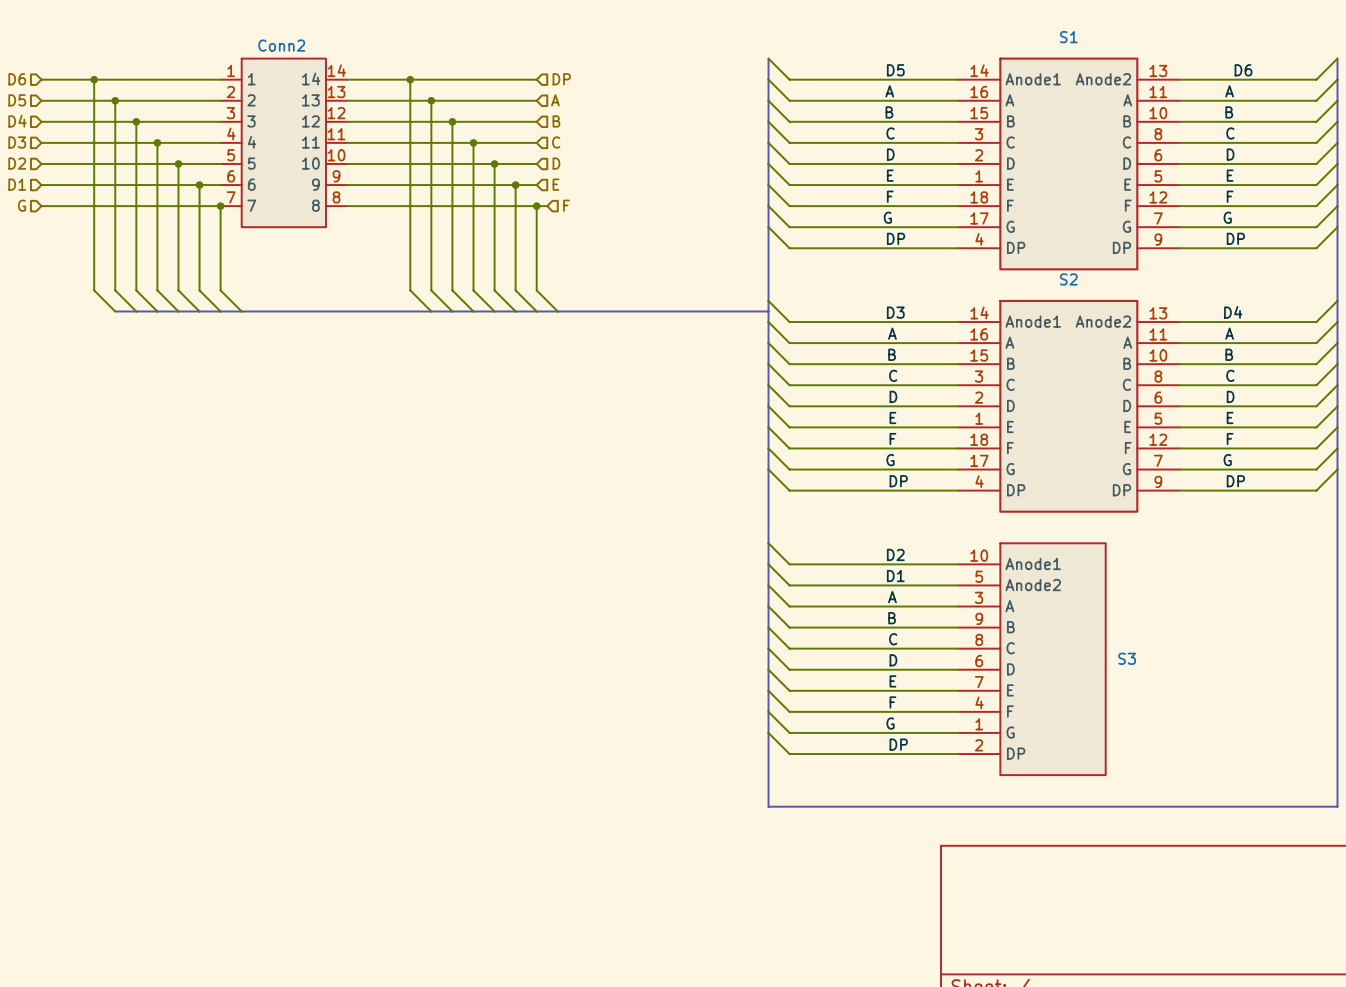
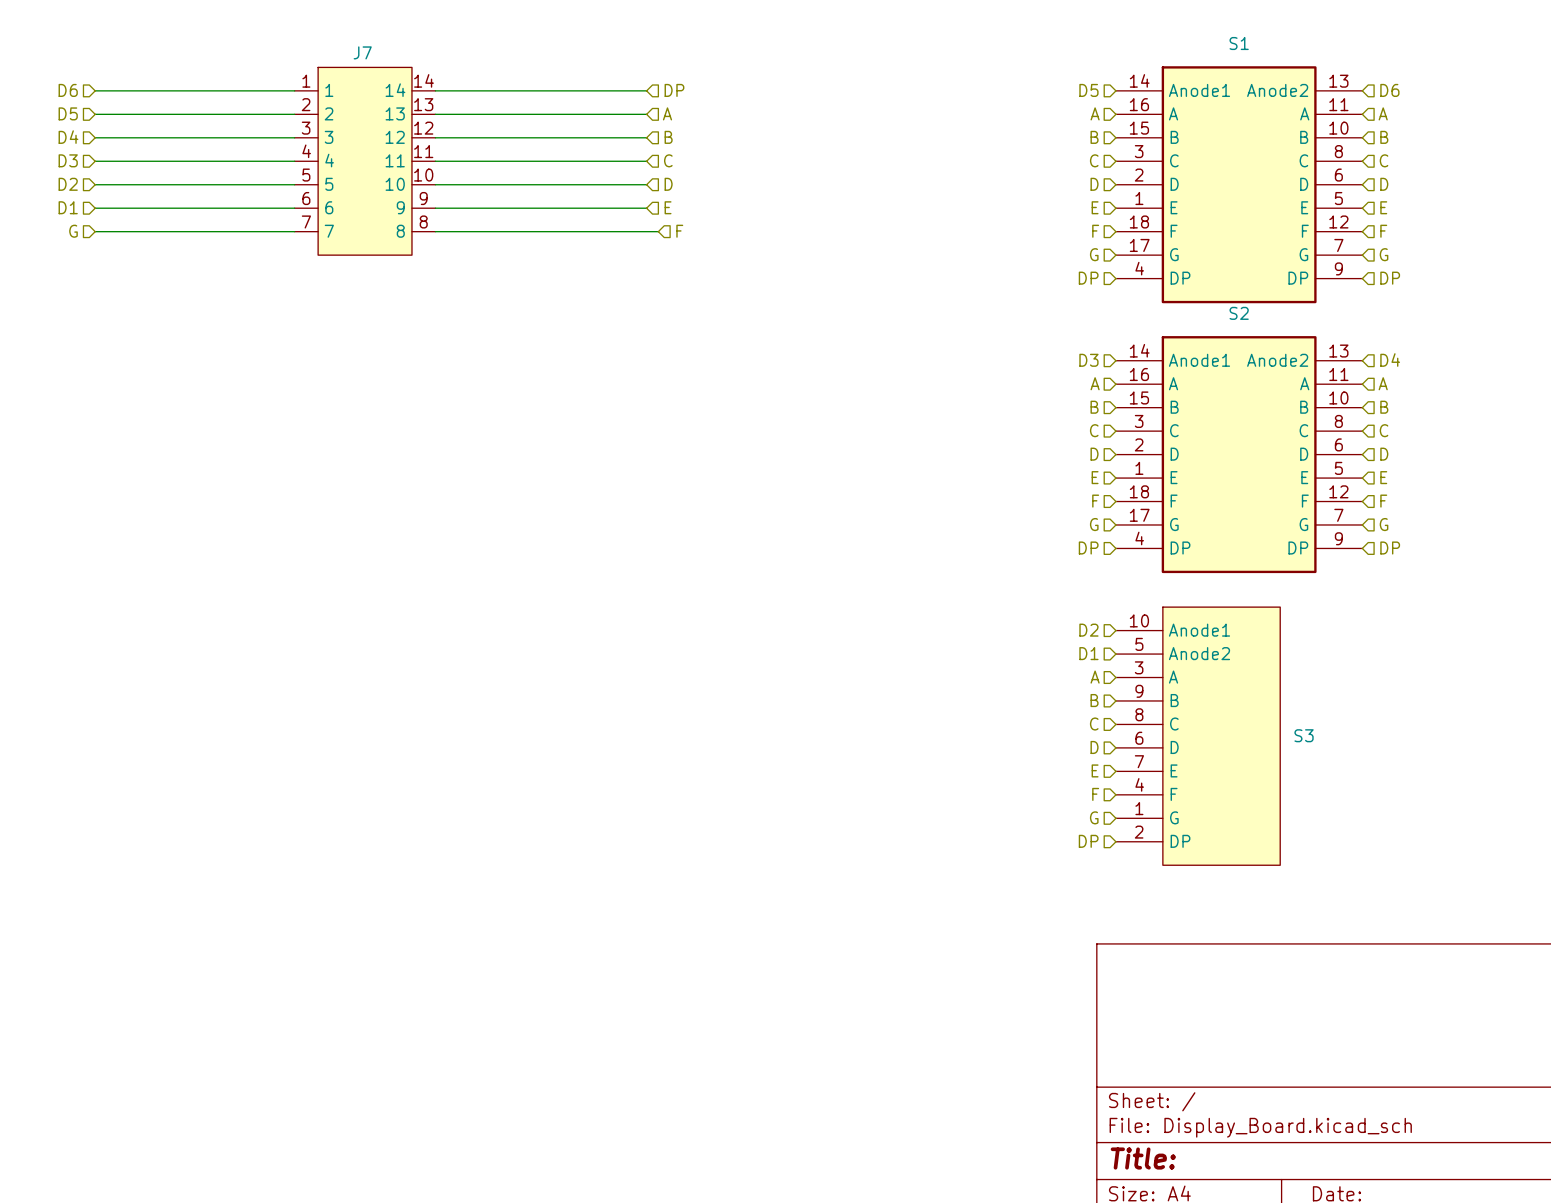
Conn2 name: Conn2 (281, 45) -> J7 (362, 52)
wire: (768, 58) (789, 79) (958, 79) -> none
bus: (768, 58) (768, 806) (1337, 806) (1337, 58) -> none
wire: (1337, 58) (1316, 79) (1179, 79) -> none
label: D5 (895, 70) -> none
label: D6 (1243, 70) -> none
wire: (94, 79) (94, 290) (115, 311) -> none
junction: (94, 79) -> none
wire: (410, 79) (410, 290) (431, 311) -> none
junction: (410, 79) -> none
wire: (768, 79) (789, 100) (958, 100) -> none
hierarchical label: none -> D5 (1088, 90)
hierarchical label: none -> D6 (1389, 90)
wire: (1337, 79) (1316, 100) (1179, 100) -> none
label: A (889, 91) -> none
label: A (1229, 91) -> none
wire: (115, 100) (115, 290) (136, 311) -> none
junction: (115, 100) -> none
wire: (431, 100) (431, 290) (452, 311) -> none
junction: (431, 100) -> none
wire: (768, 100) (789, 121) (958, 121) -> none
hierarchical label: none -> A (1095, 113)
hierarchical label: none -> A (1383, 113)
wire: (1337, 100) (1316, 121) (1179, 121) -> none
label: B (889, 112) -> none
label: B (1229, 112) -> none
wire: (136, 121) (136, 290) (157, 311) -> none
junction: (136, 121) -> none
wire: (452, 121) (452, 290) (473, 311) -> none
junction: (452, 121) -> none
wire: (768, 121) (789, 142) (958, 142) -> none
hierarchical label: none -> B (1094, 137)
hierarchical label: none -> B (1384, 137)
wire: (1337, 121) (1316, 142) (1179, 142) -> none
label: C (890, 133) -> none
label: C (1230, 133) -> none
wire: (157, 142) (157, 290) (178, 311) -> none
junction: (157, 142) -> none
wire: (473, 142) (473, 290) (494, 311) -> none
junction: (473, 142) -> none
wire: (768, 142) (789, 163) (958, 163) -> none
hierarchical label: none -> C (1094, 160)
hierarchical label: none -> C (1384, 160)
wire: (1337, 142) (1316, 163) (1179, 163) -> none
label: D (890, 154) -> none
label: D (1230, 154) -> none
wire: (178, 163) (178, 290) (199, 311) -> none
junction: (178, 163) -> none
wire: (494, 163) (494, 290) (515, 311) -> none
junction: (494, 163) -> none
wire: (768, 163) (789, 185) (958, 185) -> none
hierarchical label: none -> D (1094, 184)
hierarchical label: none -> D (1384, 184)
wire: (1337, 163) (1316, 185) (1179, 185) -> none
label: E (890, 175) -> none
label: E (1230, 175) -> none
hierarchical label: none -> E (1095, 207)
hierarchical label: none -> E (1383, 207)
wire: (199, 185) (199, 290) (220, 311) -> none
junction: (199, 185) -> none
wire: (515, 185) (515, 290) (536, 311) -> none
junction: (515, 185) -> none
wire: (768, 185) (789, 206) (958, 206) -> none
wire: (1337, 185) (1316, 206) (1179, 206) -> none
label: F (890, 196) -> none
label: F (1230, 196) -> none
hierarchical label: none -> F (1095, 231)
hierarchical label: none -> F (1383, 231)
wire: (220, 206) (220, 290) (241, 311) -> none
junction: (220, 206) -> none
wire: (536, 206) (536, 290) (557, 311) -> none
junction: (536, 206) -> none
wire: (768, 206) (789, 227) (958, 227) -> none
wire: (1337, 206) (1316, 227) (1179, 227) -> none
label: G (887, 217) -> none
label: G (1227, 217) -> none
hierarchical label: none -> G (1094, 254)
hierarchical label: none -> G (1384, 254)
wire: (768, 227) (789, 248) (958, 248) -> none
wire: (1337, 227) (1316, 248) (1179, 248) -> none
label: DP (896, 238) -> none
label: DP (1235, 238) -> none
hierarchical label: none -> DP (1088, 278)
hierarchical label: none -> DP (1390, 278)
wire: (768, 300) (789, 322) (958, 322) -> none
wire: (1337, 300) (1316, 322) (1179, 322) -> none
bus: (115, 311) (768, 311) -> none
label: D3 (895, 312) -> none
label: D4 (1233, 312) -> none
hierarchical label: none -> D3 (1088, 360)
hierarchical label: none -> D4 (1390, 360)
wire: (768, 322) (789, 343) (958, 343) -> none
wire: (1337, 322) (1316, 343) (1179, 343) -> none
label: A (892, 333) -> none
label: A (1229, 333) -> none
hierarchical label: none -> A (1095, 383)
hierarchical label: none -> A (1383, 383)
wire: (768, 343) (789, 364) (958, 364) -> none
wire: (1337, 343) (1316, 364) (1179, 364) -> none
label: B (892, 354) -> none
label: B (1229, 354) -> none
hierarchical label: none -> B (1094, 407)
hierarchical label: none -> B (1384, 407)
wire: (768, 364) (789, 385) (958, 385) -> none
wire: (1337, 364) (1316, 385) (1179, 385) -> none
label: C (893, 375) -> none
label: C (1230, 375) -> none
hierarchical label: none -> C (1094, 430)
hierarchical label: none -> C (1384, 430)
wire: (768, 385) (789, 406) (958, 406) -> none
wire: (1337, 385) (1316, 406) (1179, 406) -> none
label: D (893, 396) -> none
label: D (1230, 396) -> none
hierarchical label: none -> D (1094, 454)
hierarchical label: none -> D (1384, 454)
wire: (768, 406) (789, 427) (958, 427) -> none
wire: (1337, 406) (1316, 427) (1179, 427) -> none
label: E (892, 417) -> none
label: E (1230, 417) -> none
hierarchical label: none -> E (1095, 477)
hierarchical label: none -> E (1383, 477)
wire: (768, 427) (789, 448) (958, 448) -> none
wire: (1337, 427) (1316, 448) (1179, 448) -> none
label: F (892, 439) -> none
label: F (1230, 439) -> none
wire: (768, 448) (789, 469) (958, 469) -> none
hierarchical label: none -> F (1095, 501)
hierarchical label: none -> F (1383, 501)
wire: (1337, 448) (1316, 469) (1179, 469) -> none
label: G (890, 460) -> none
label: G (1227, 460) -> none
wire: (768, 469) (789, 490) (958, 490) -> none
hierarchical label: none -> G (1094, 524)
hierarchical label: none -> G (1384, 524)
wire: (1337, 469) (1316, 490) (1179, 490) -> none
label: DP (898, 481) -> none
label: DP (1235, 481) -> none
hierarchical label: none -> DP (1088, 548)
hierarchical label: none -> DP (1390, 548)
wire: (768, 543) (789, 564) (958, 564) -> none
label: D2 (895, 554) -> none
hierarchical label: none -> D2 (1088, 630)
wire: (768, 564) (789, 585) (958, 585) -> none
label: D1 (895, 576) -> none
wire: (768, 585) (789, 606) (958, 606) -> none
hierarchical label: none -> D1 (1088, 653)
label: A (892, 597) -> none
wire: (768, 606) (789, 627) (958, 627) -> none
hierarchical label: none -> A (1095, 677)
label: B (892, 618) -> none
wire: (768, 627) (789, 648) (958, 648) -> none
hierarchical label: none -> B (1094, 700)
label: C (893, 639) -> none
wire: (768, 648) (789, 669) (958, 669) -> none
hierarchical label: none -> C (1094, 724)
label: D (893, 660) -> none
wire: (768, 669) (789, 690) (958, 690) -> none
hierarchical label: none -> D (1094, 747)
label: E (892, 681) -> none
wire: (768, 690) (789, 711) (958, 711) -> none
hierarchical label: none -> E (1095, 770)
label: F (892, 702) -> none
wire: (768, 711) (789, 732) (958, 732) -> none
hierarchical label: none -> F (1095, 794)
label: G (890, 723) -> none
wire: (768, 732) (789, 754) (958, 754) -> none
hierarchical label: none -> G (1094, 817)
label: DP (898, 744) -> none
hierarchical label: none -> DP (1088, 841)

